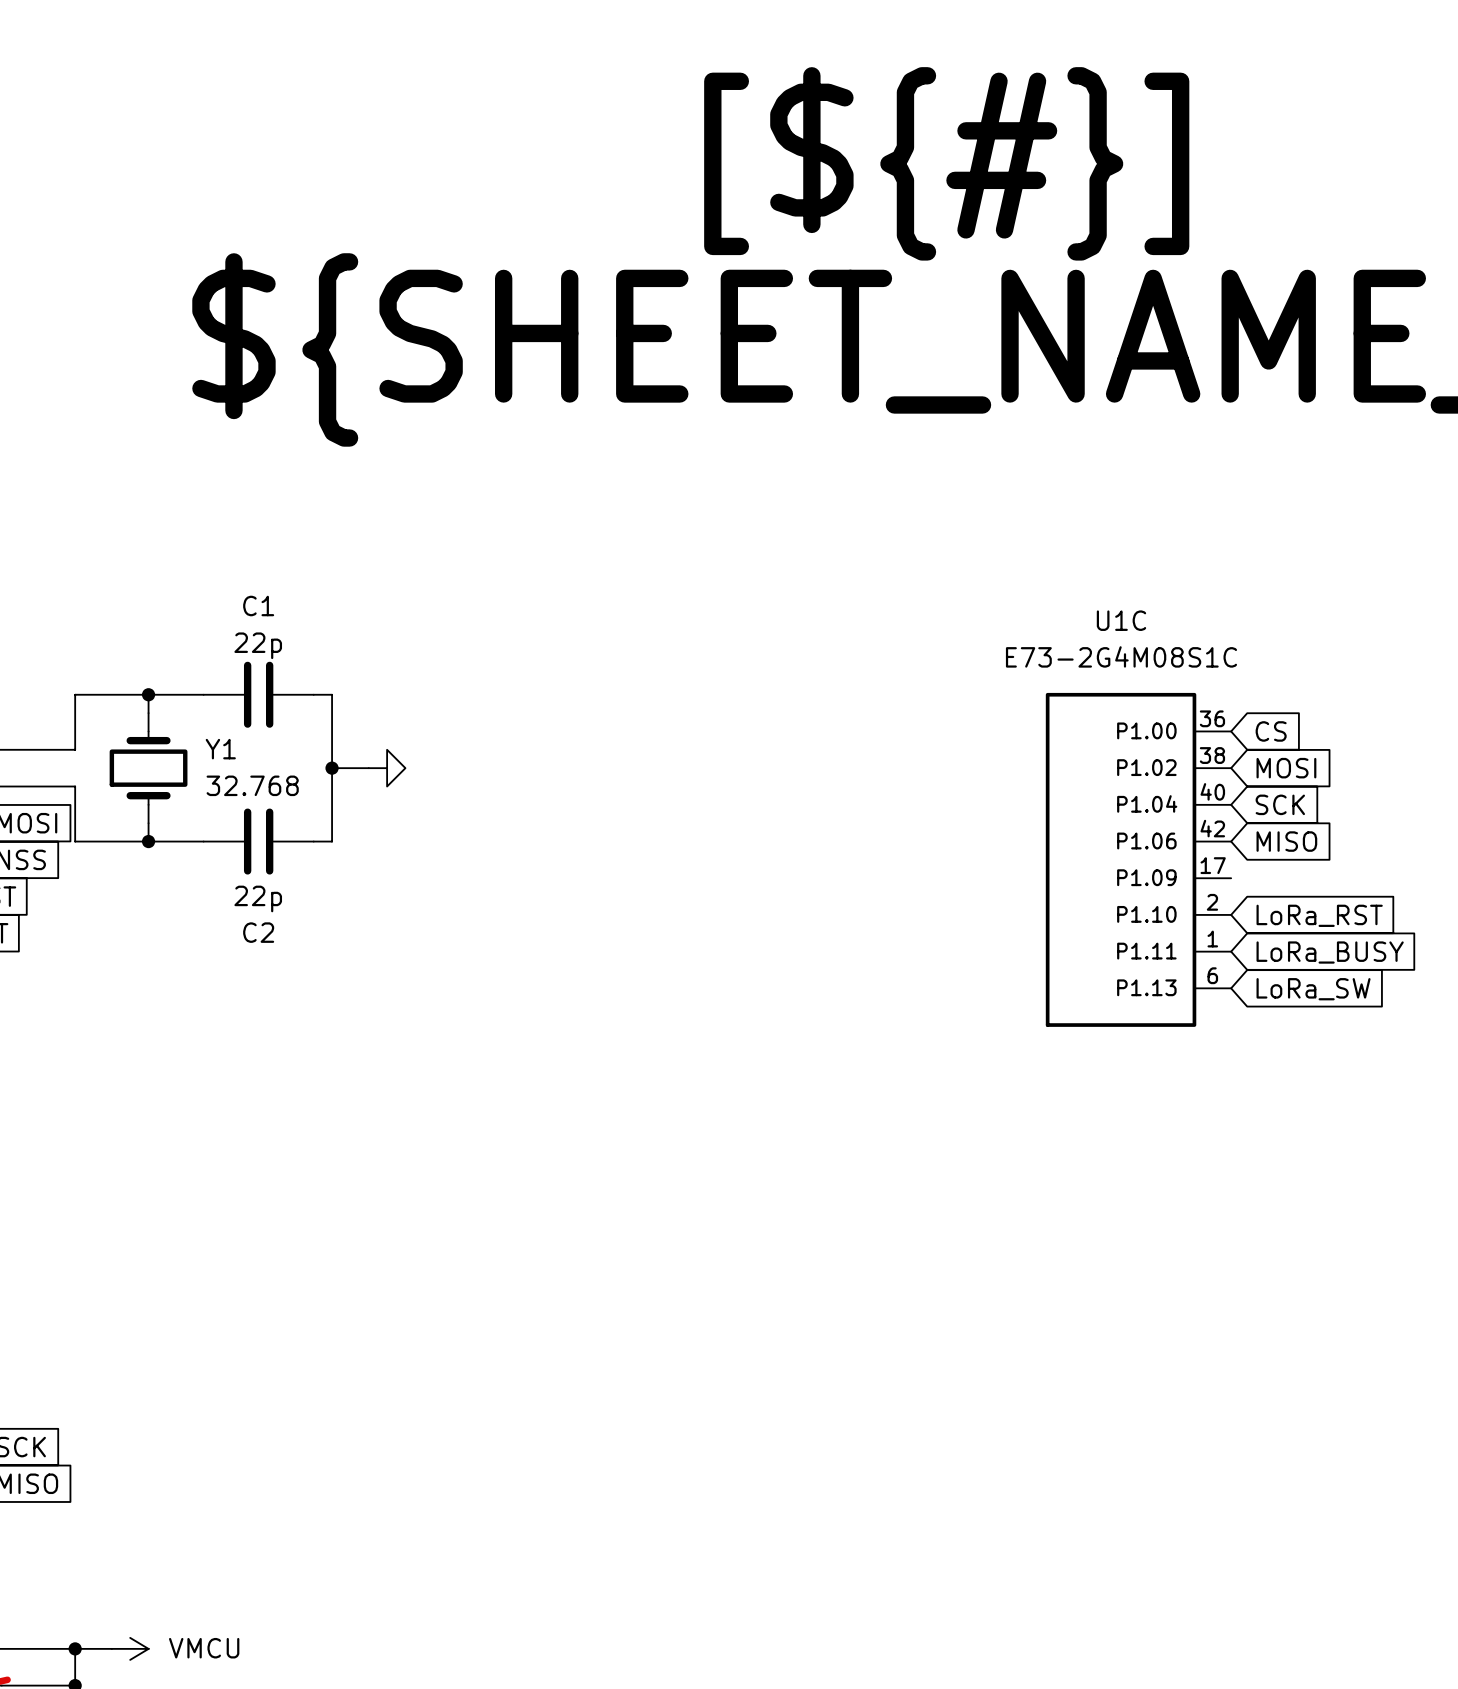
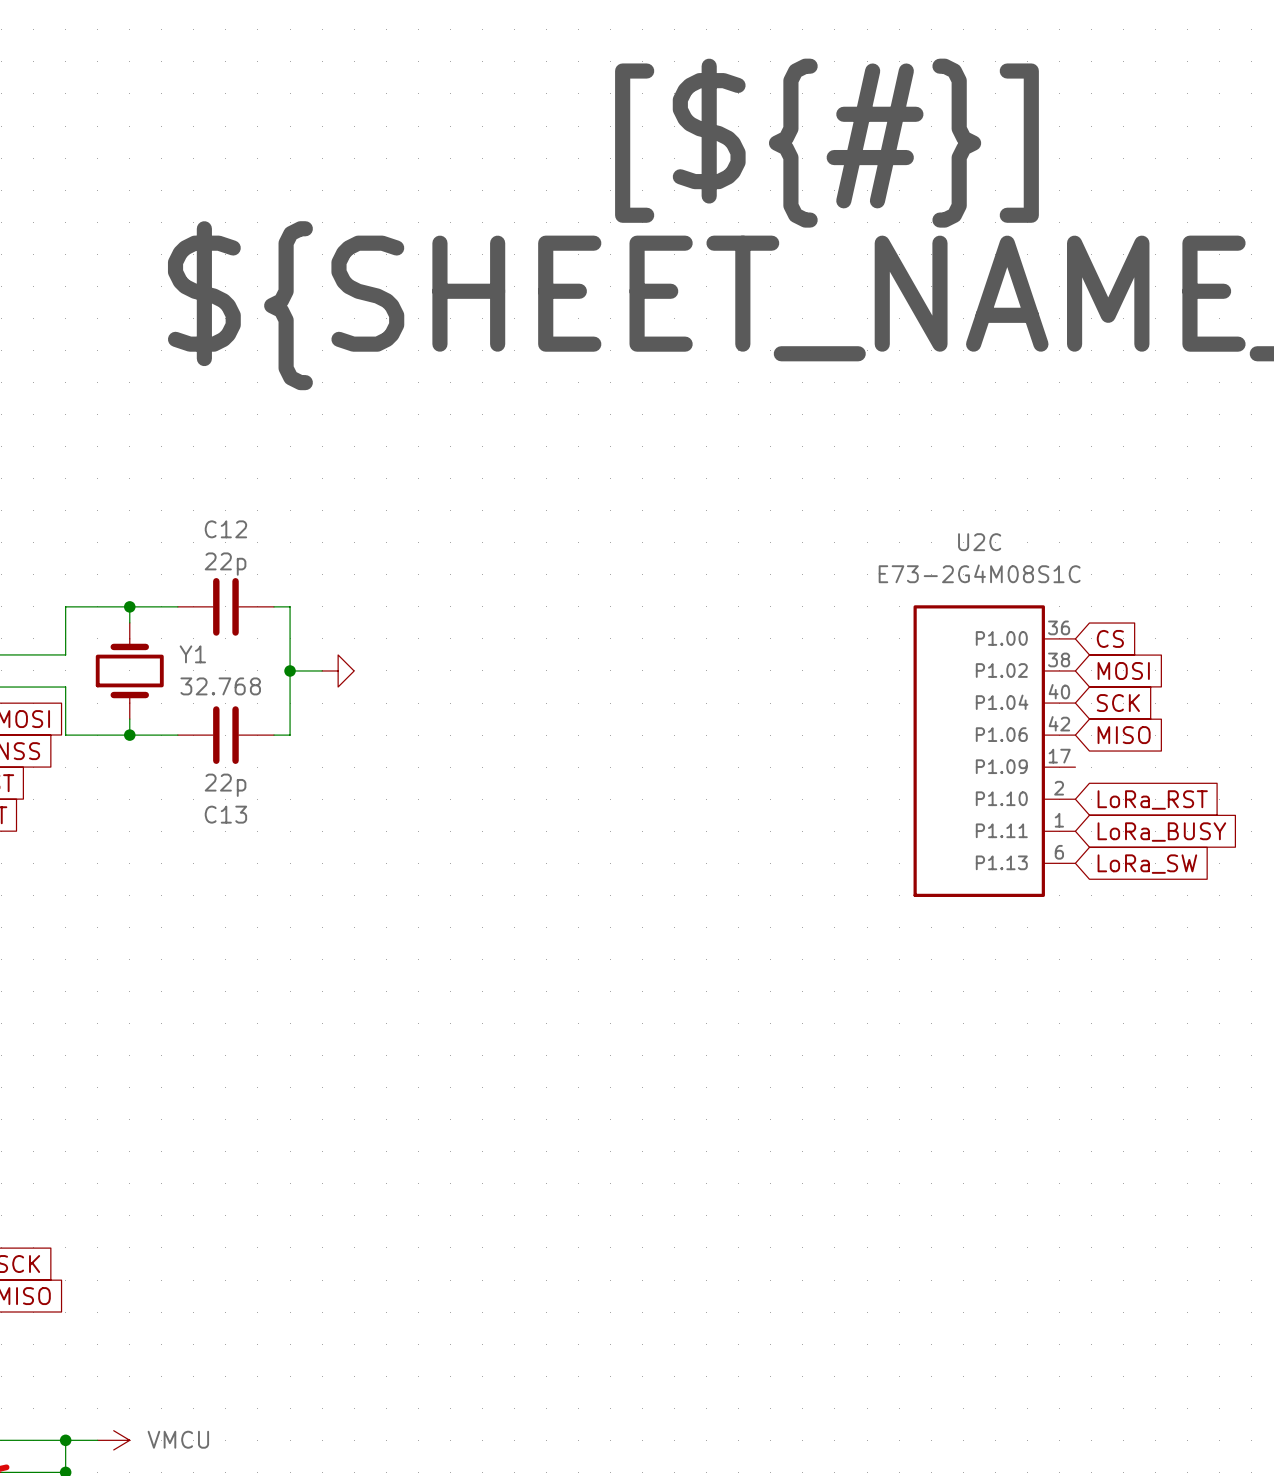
C1 name: C1 (258, 606) -> C12 (225, 529)
U1C name: U1C (1121, 620) -> U2C (979, 542)
C2 name: C2 (258, 932) -> C13 (225, 814)

